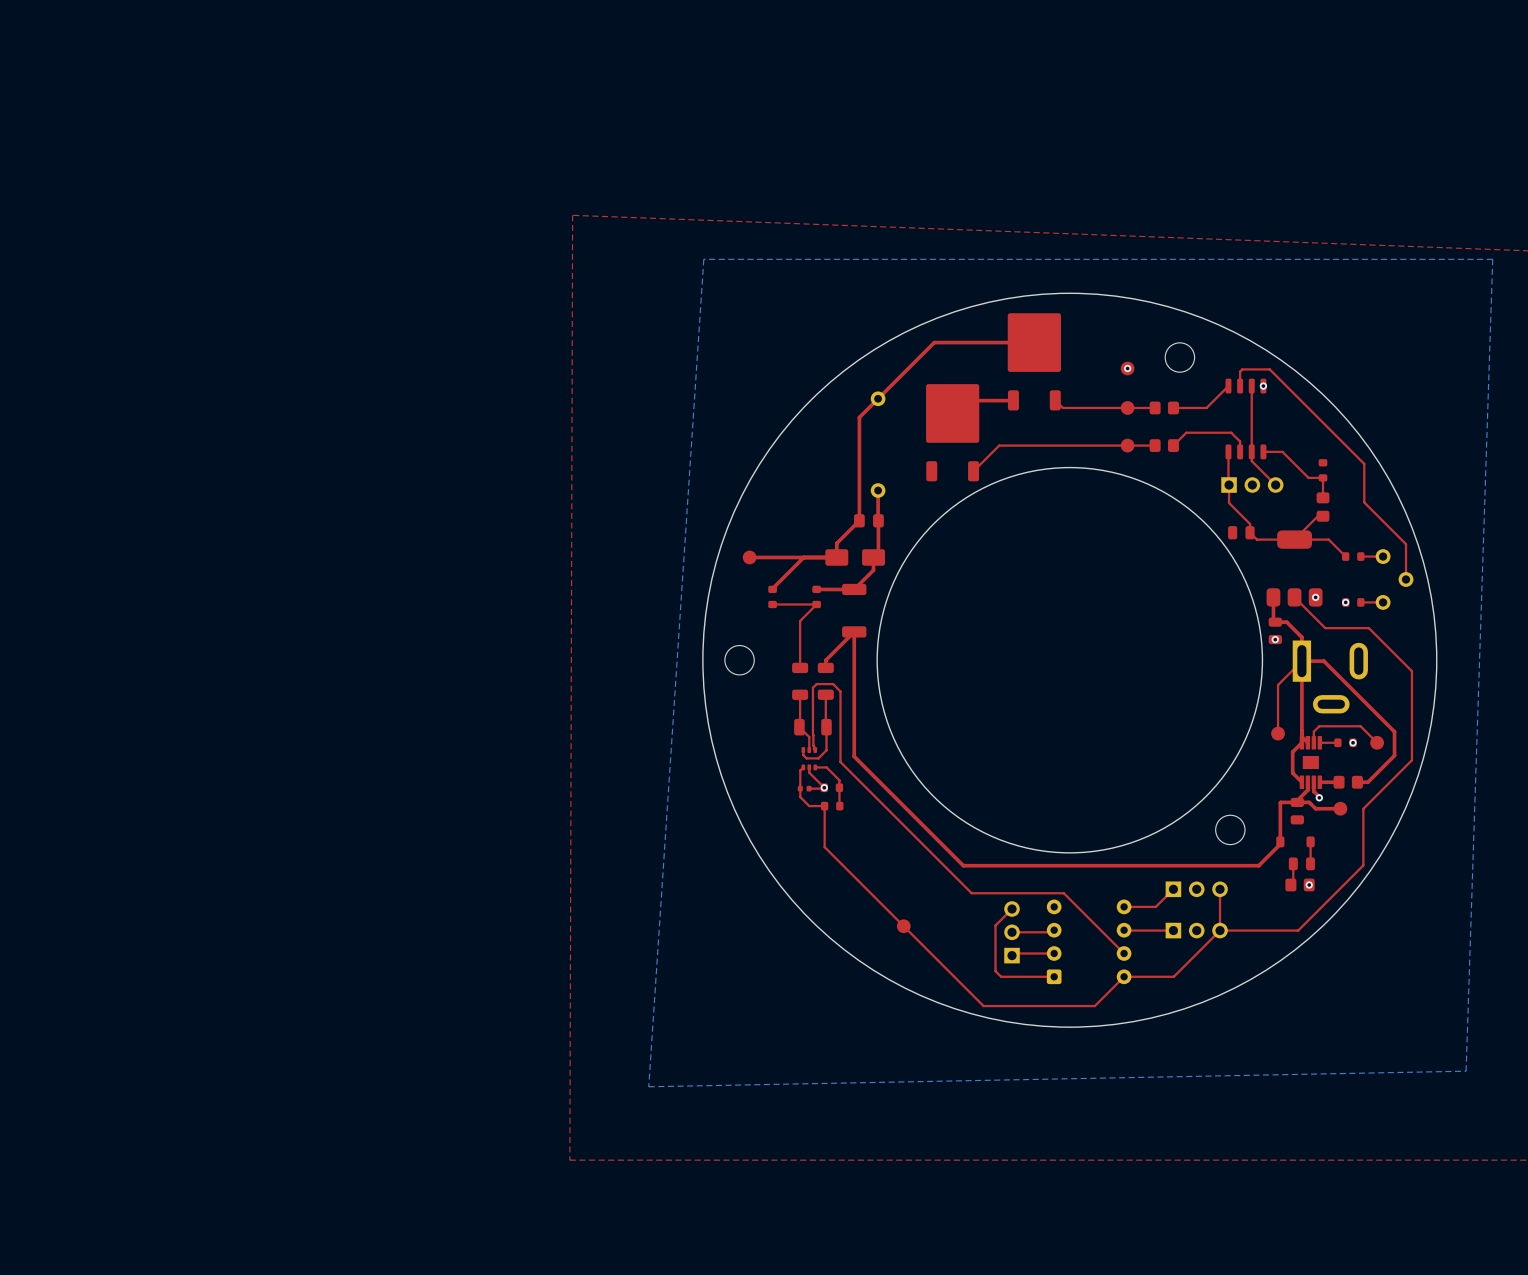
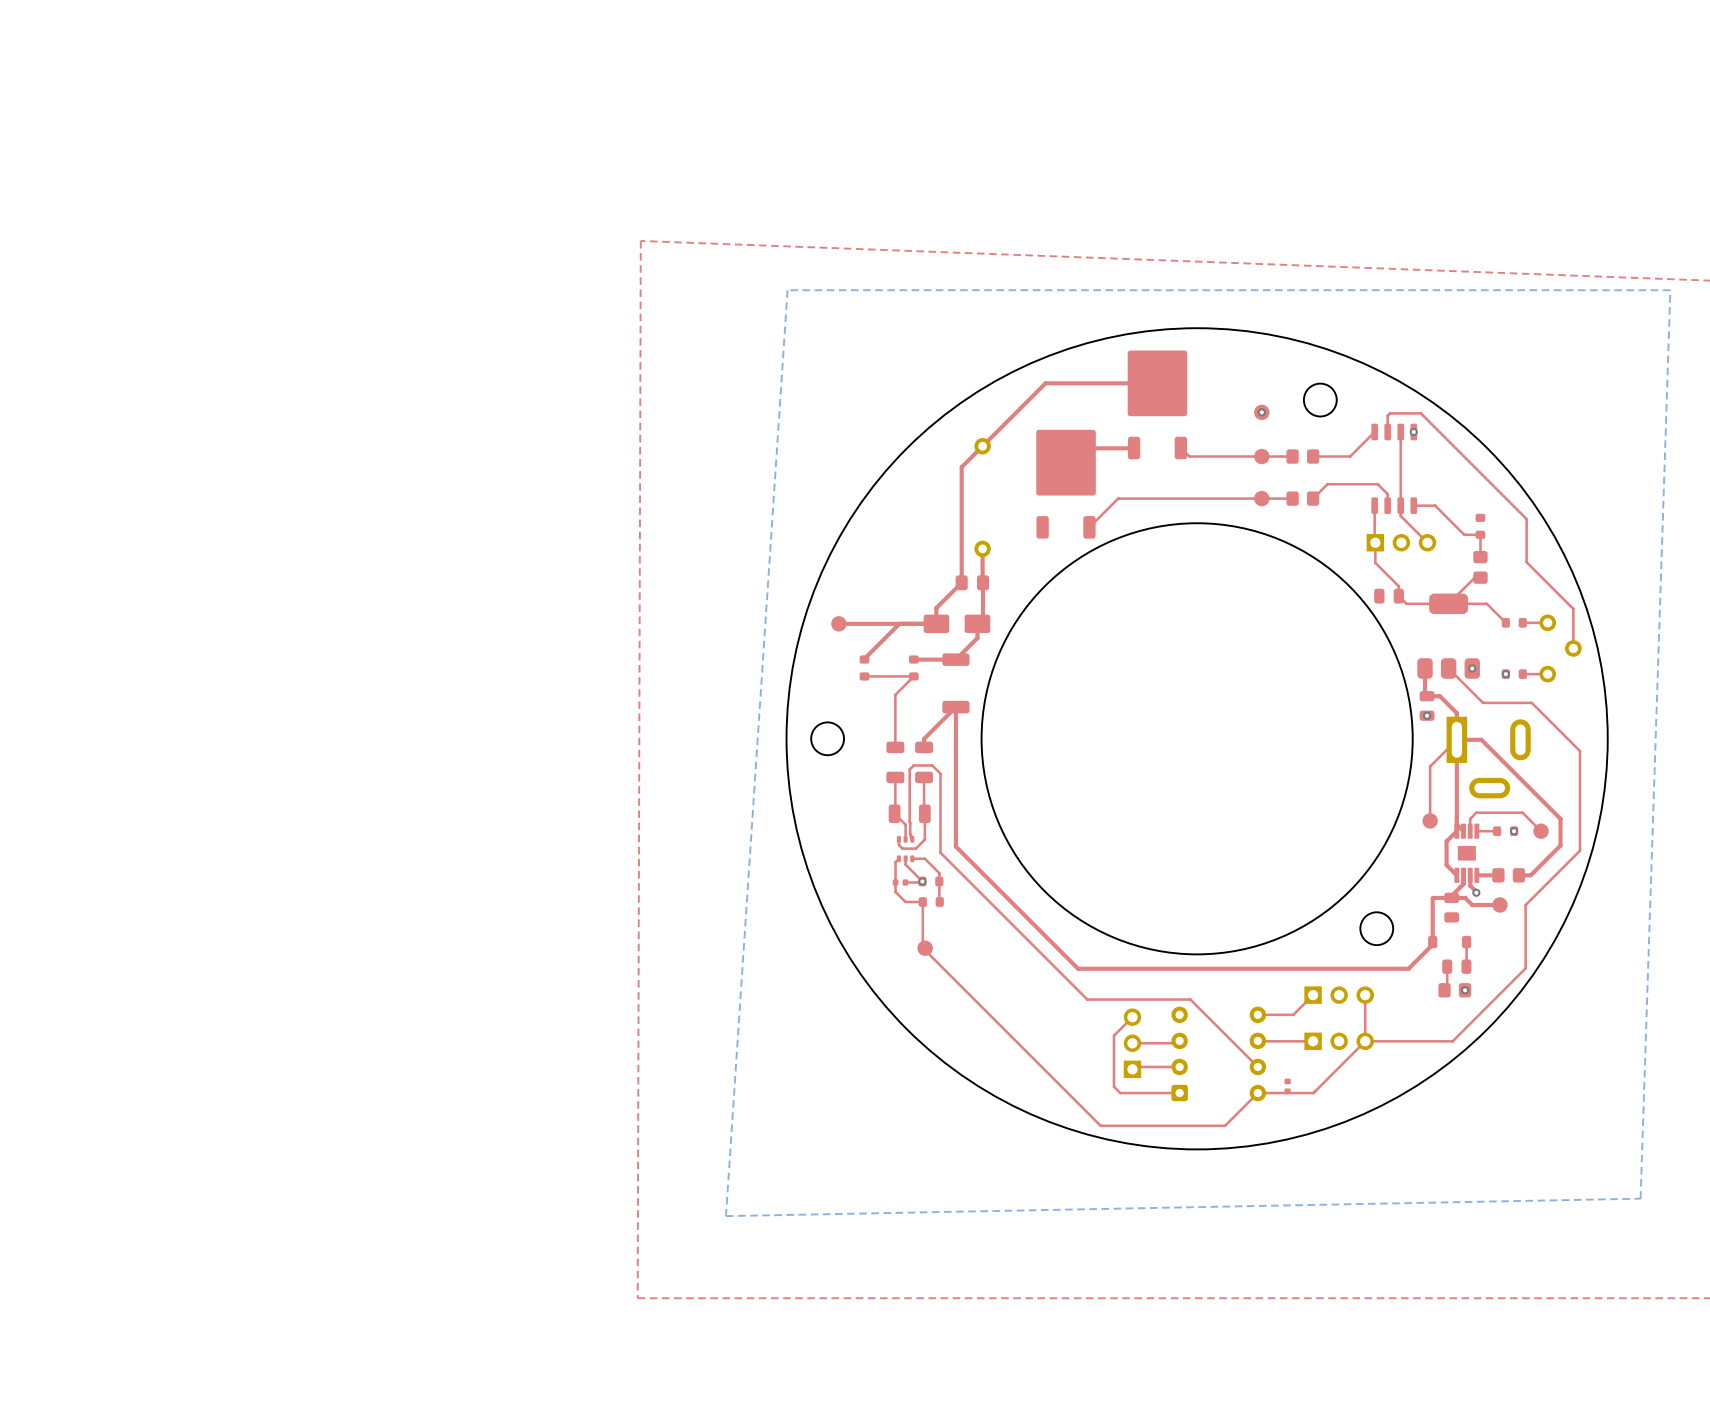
part position: (903, 926) -> (925, 948)
part: none -> (1287, 1086)

